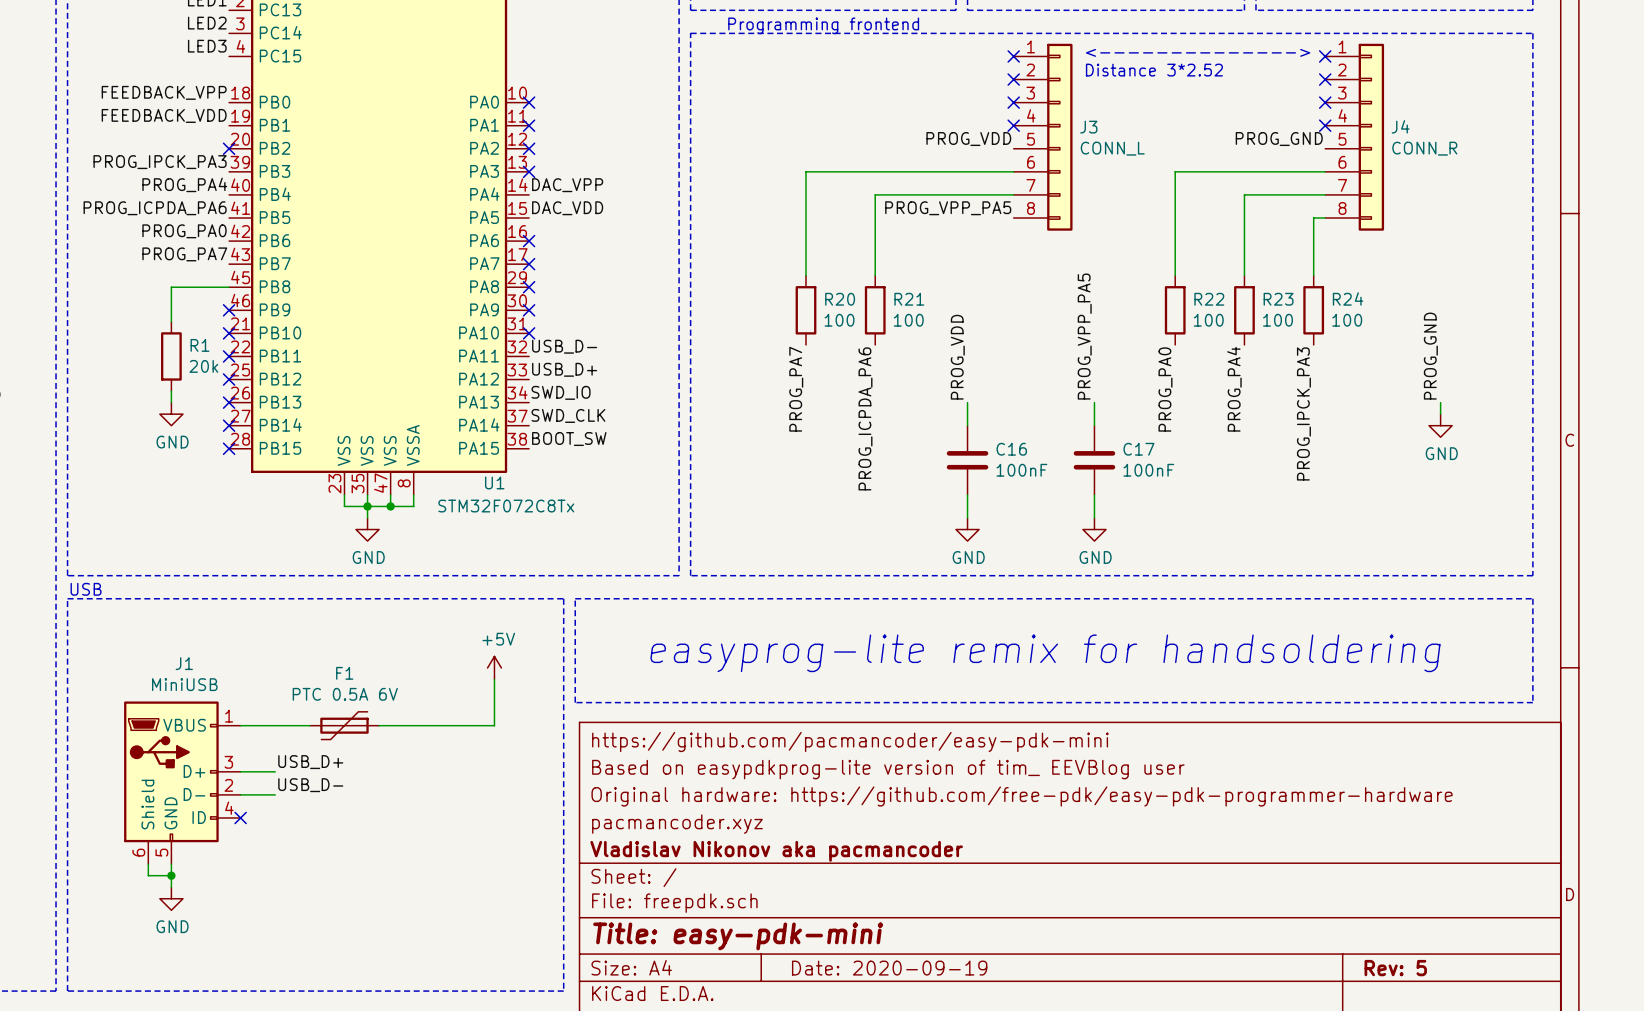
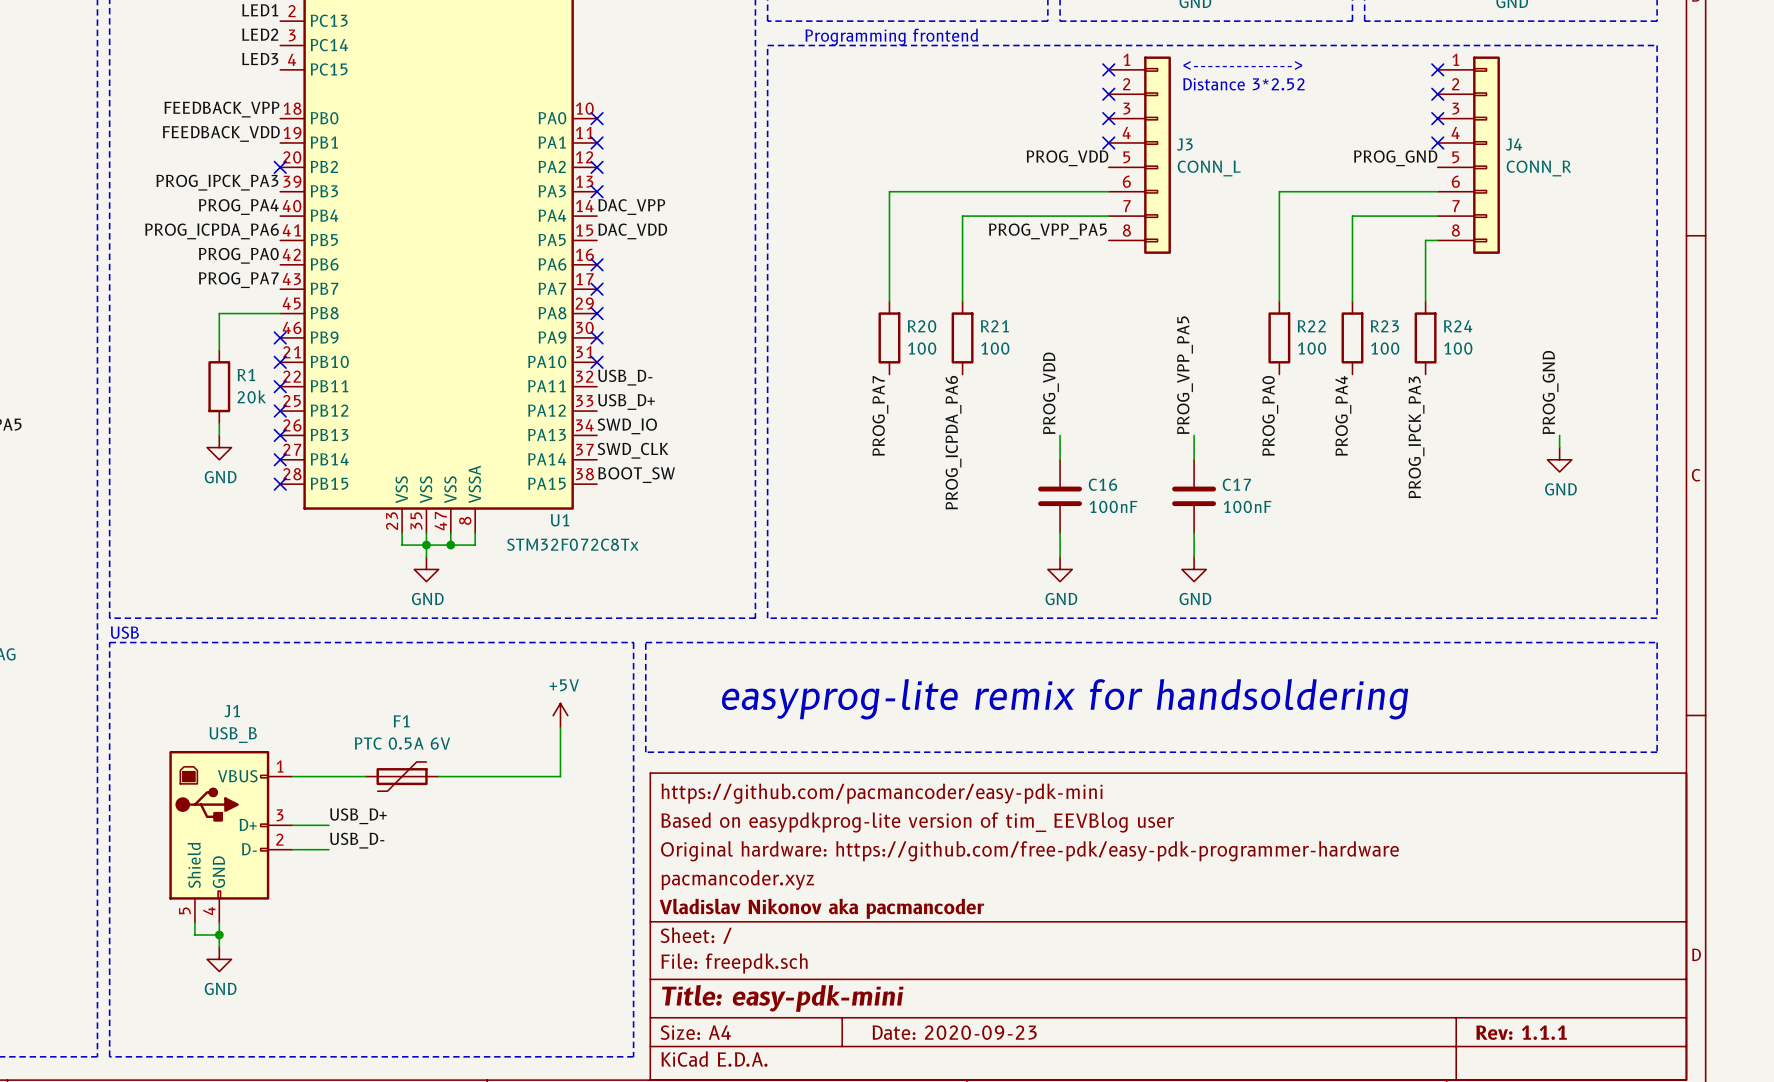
J1 value: MiniUSB (184, 684) -> USB_B (233, 735)
J1 symbol: [124, 701, 241, 865] -> [169, 750, 293, 923]
no-connect mark: (240, 817) -> none
title block: Date: 2020-09-19 (889, 968) -> Date: 2020-09-23 (954, 1032)
title block: Rev: 5 (1395, 968) -> Rev: 1.1.1 (1521, 1032)

